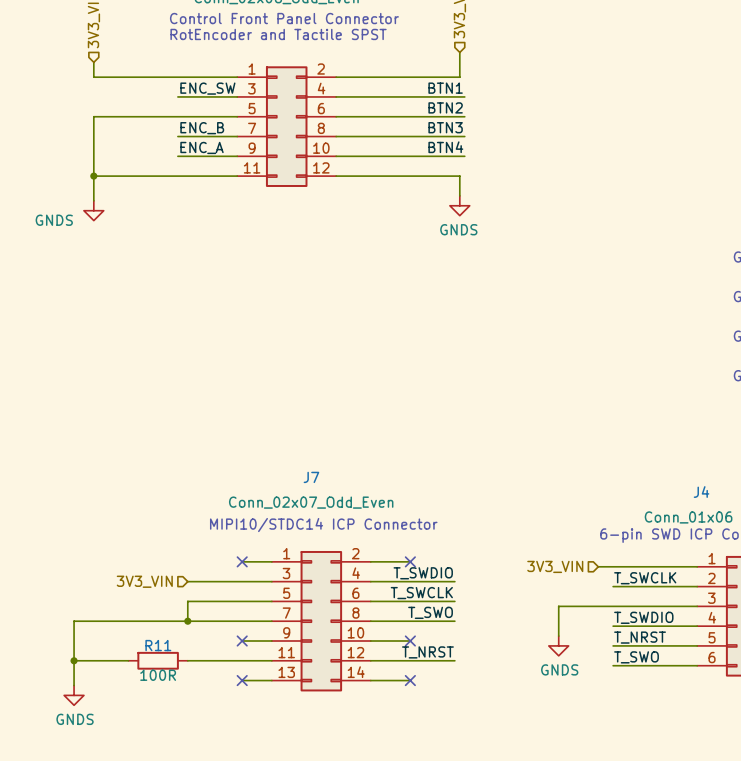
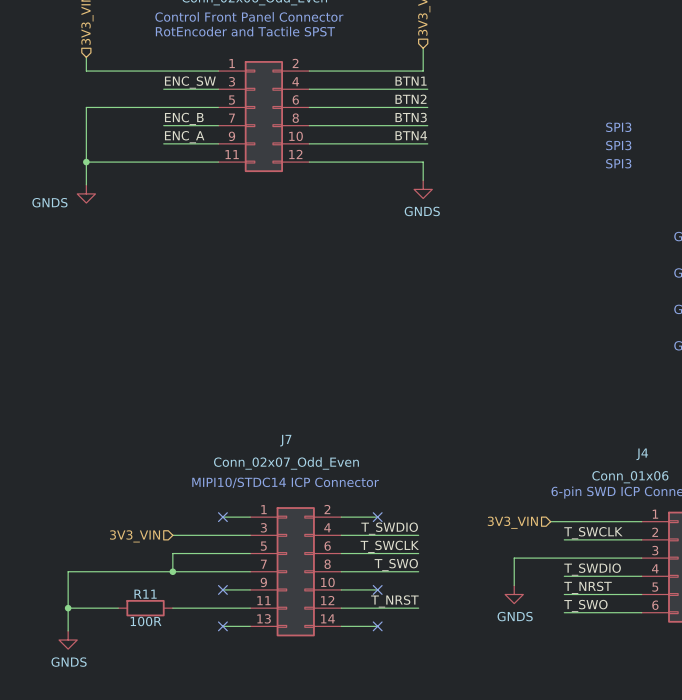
text: none -> SPI3 (618, 127)
text: none -> SPI3 (618, 145)
text: none -> SPI3 (618, 163)

